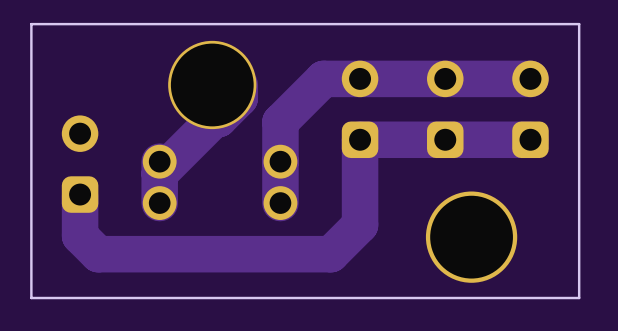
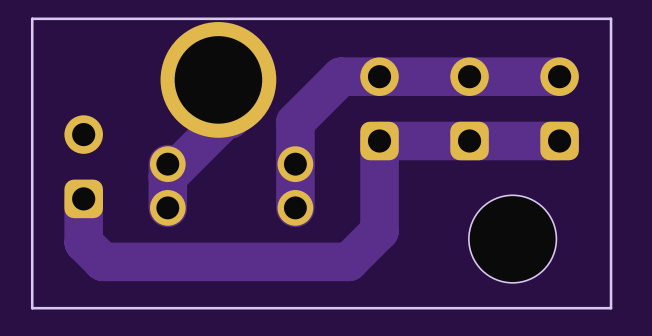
part footprint: [168, 40, 257, 130] -> [160, 22, 277, 138]
part: none -> (512, 239)
part: (471, 237) -> none

